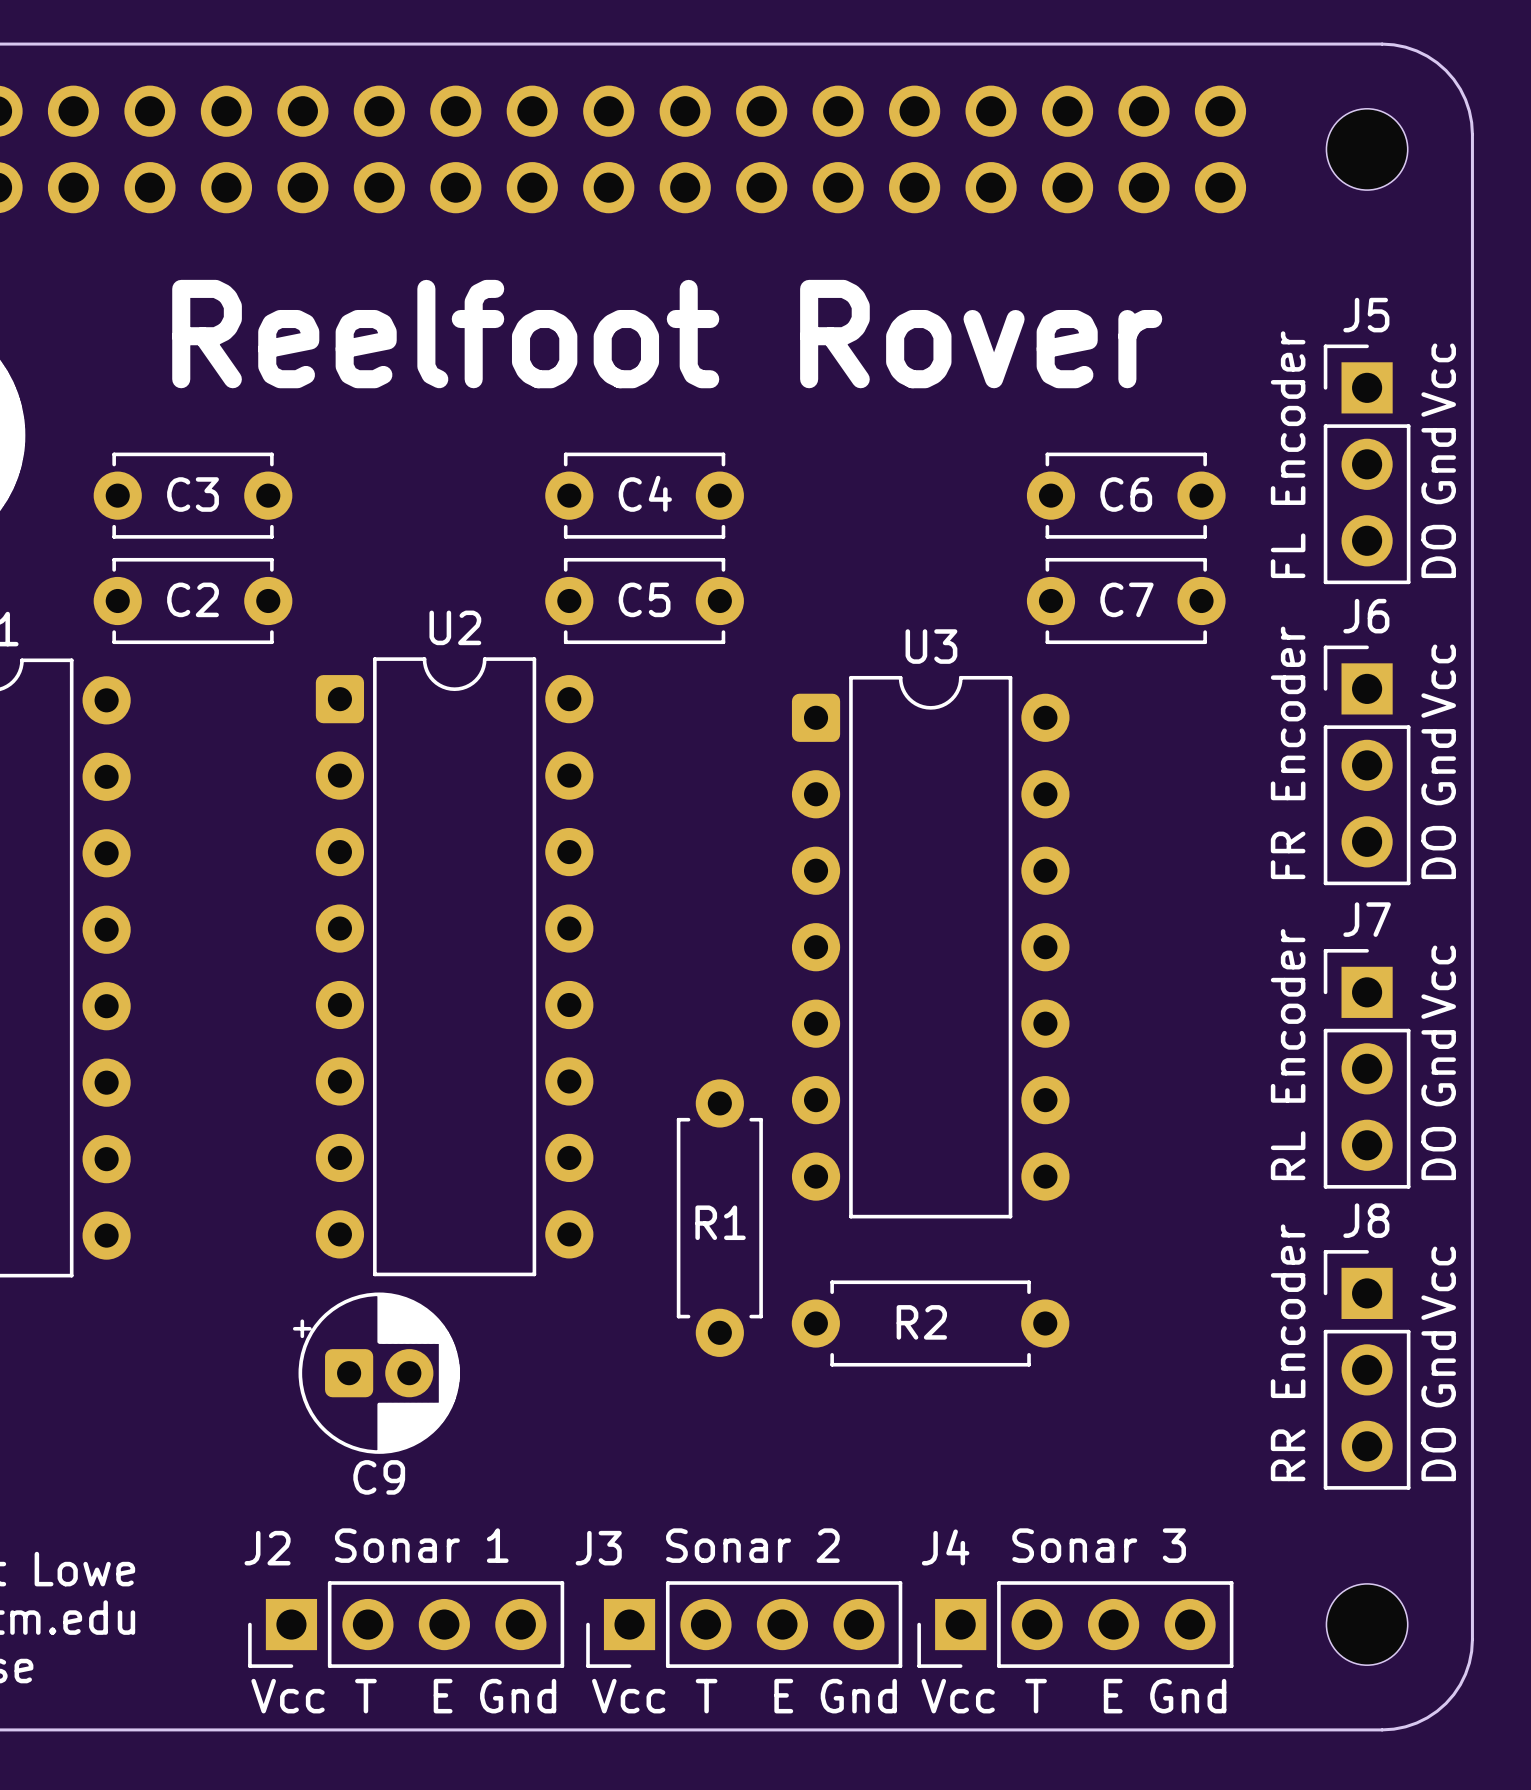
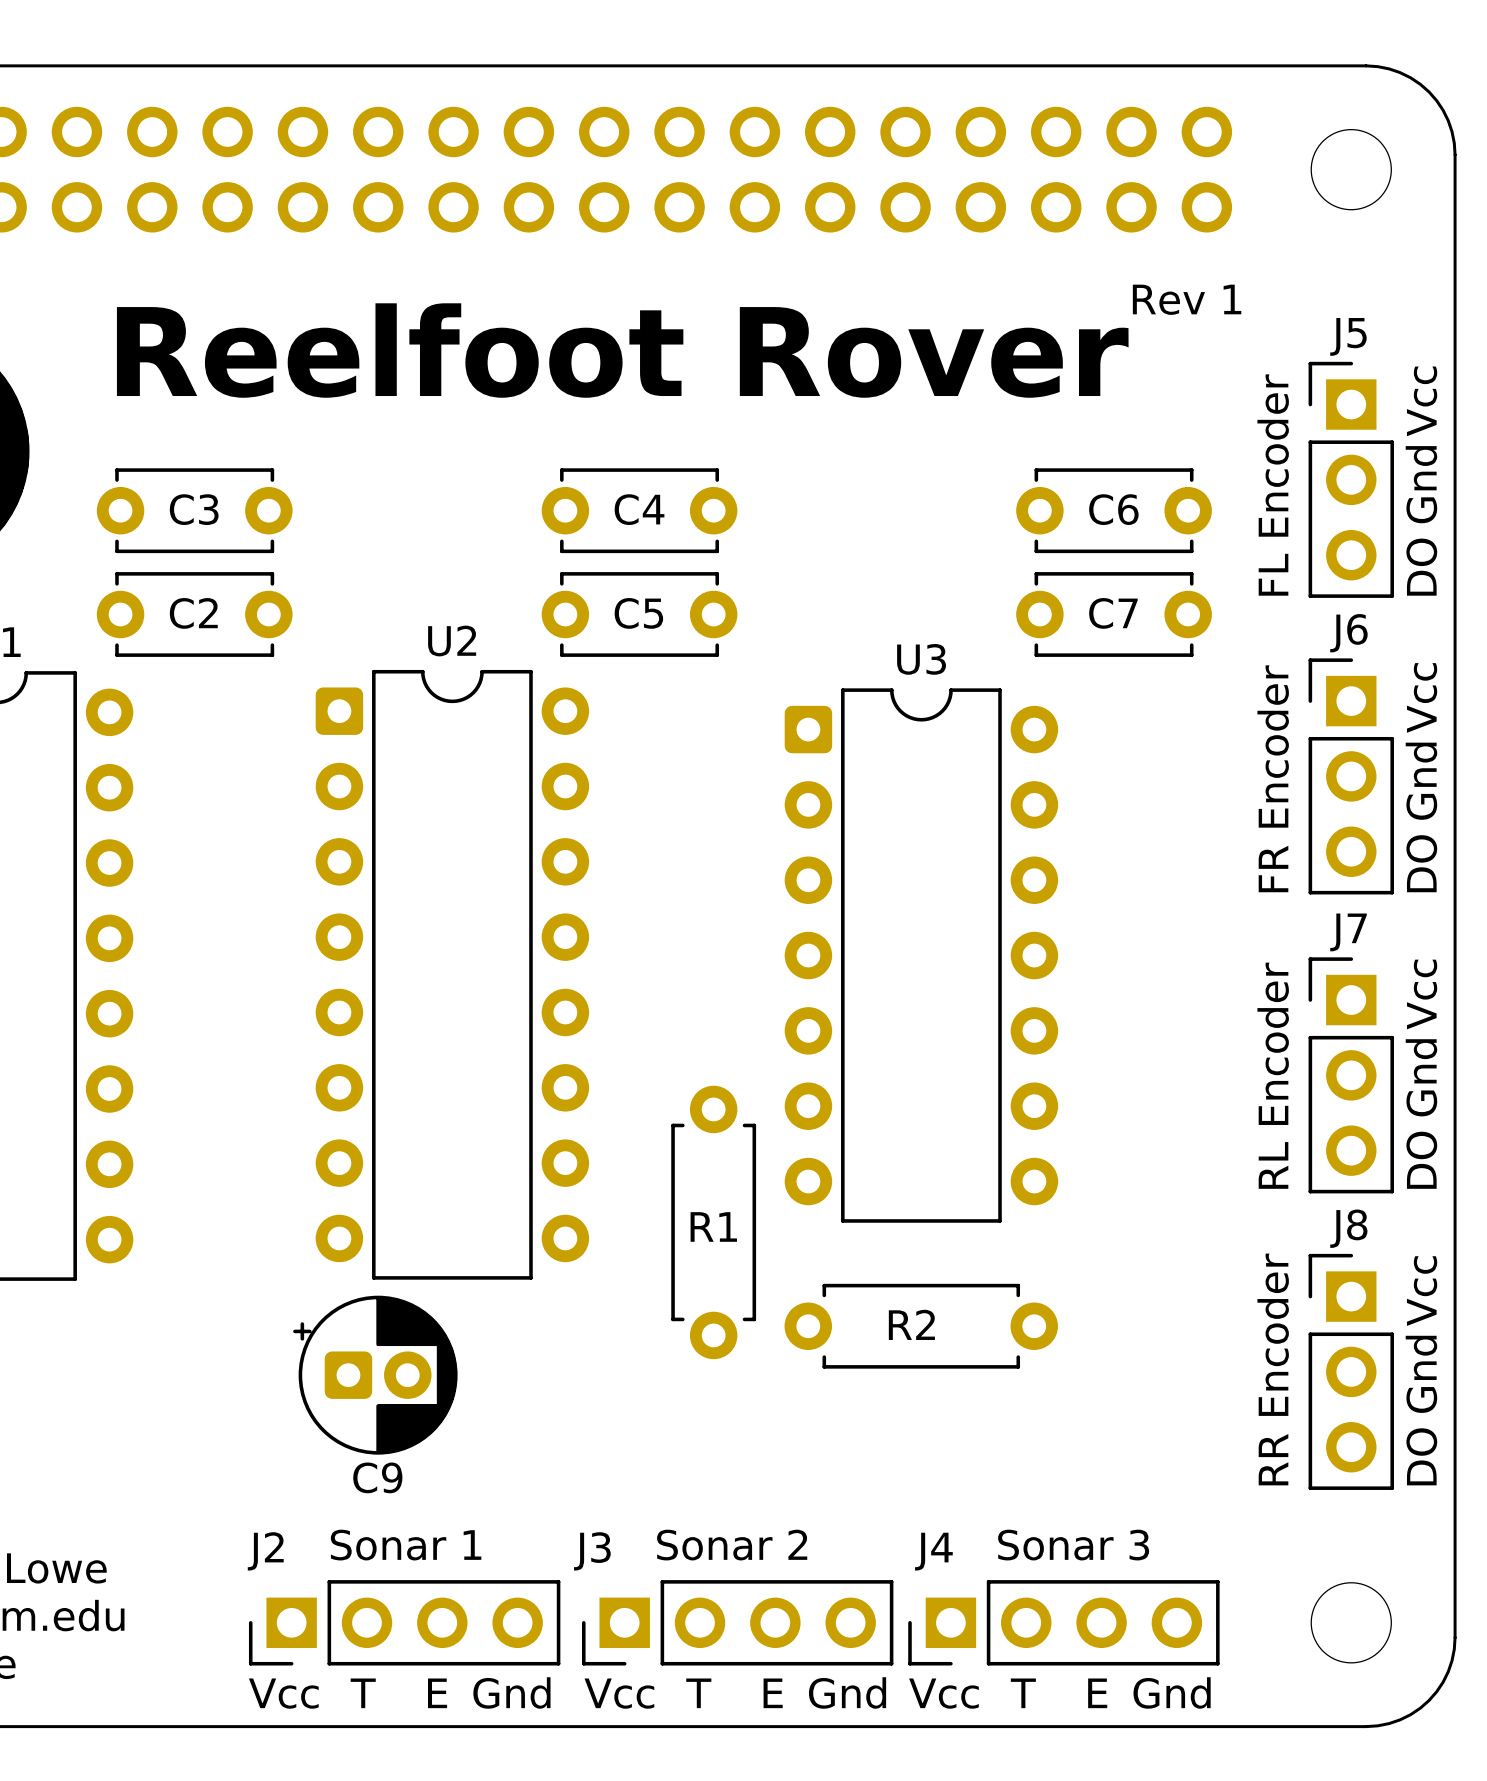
text: none -> Rev 1 (1187, 299)
text position: Reelfoot Rover (667, 334) -> Reelfoot Rover (622, 350)

